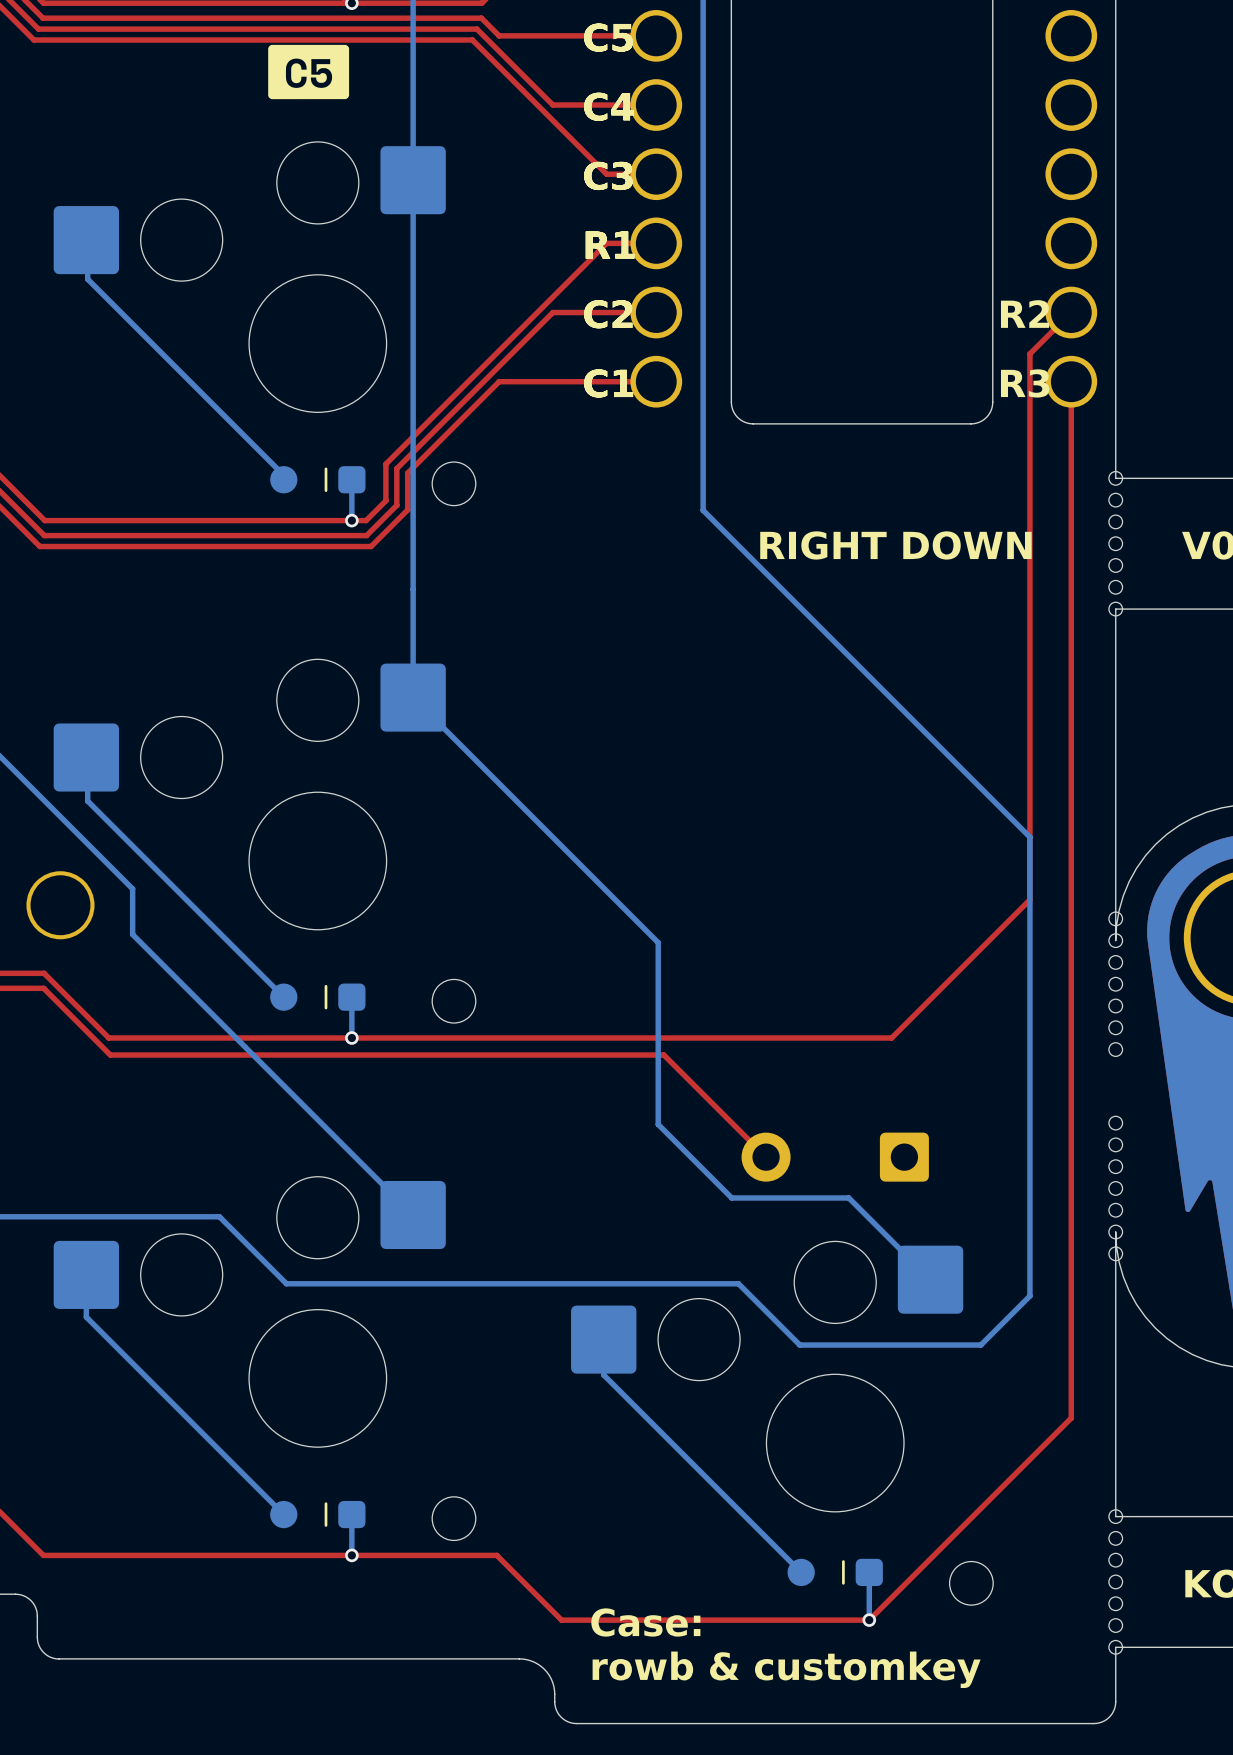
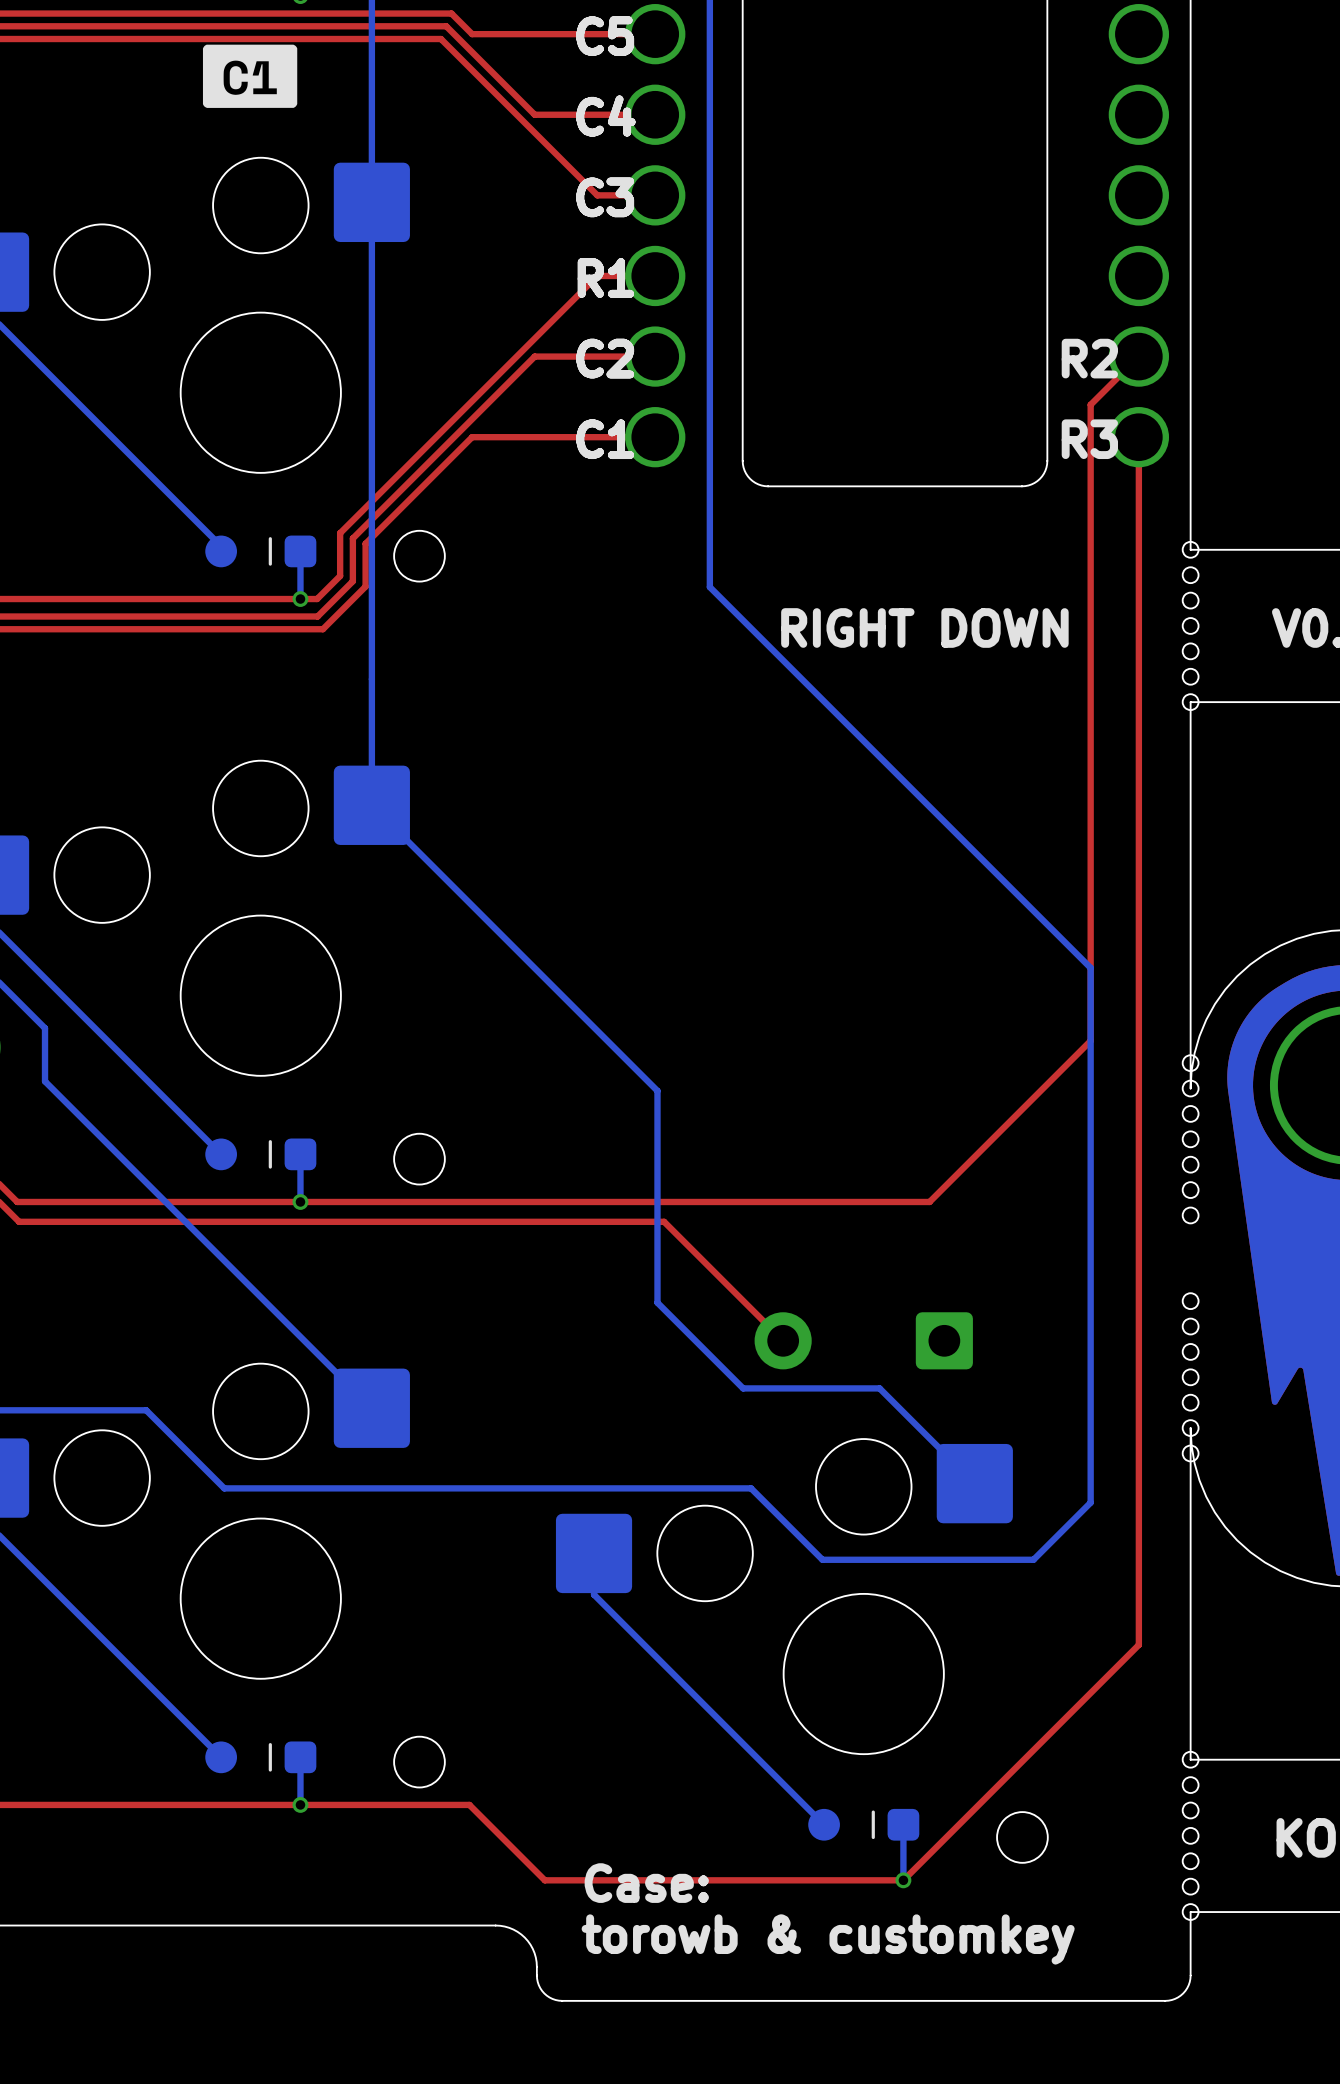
drawing shape: [268, 44, 350, 100] -> [202, 44, 298, 108]
text: rowb & customkey (786, 1669) -> torowb & customkey (828, 1939)

